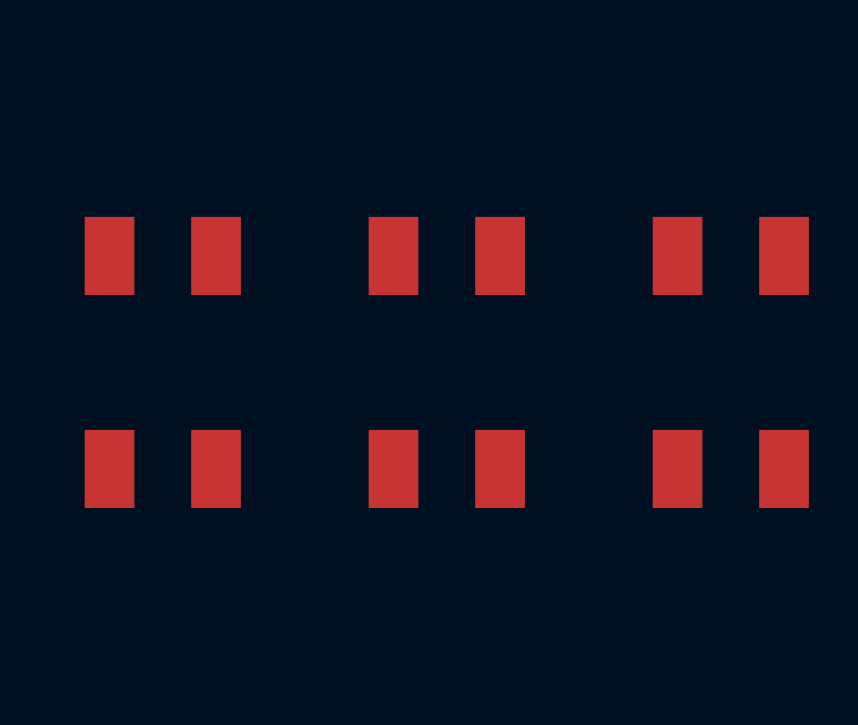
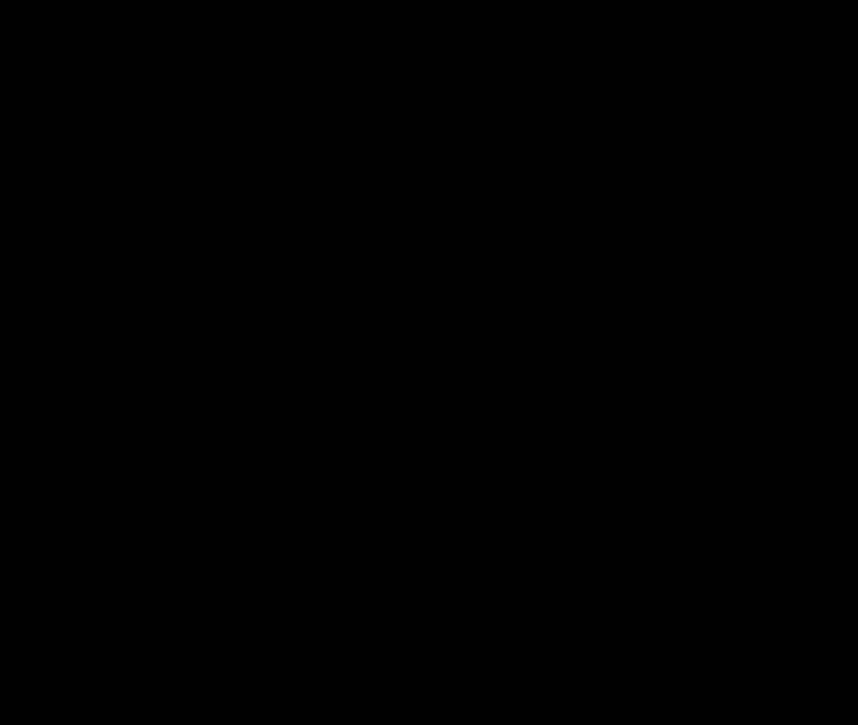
part: (162, 255) -> none
part: (446, 255) -> none
part: (730, 255) -> none
part: (162, 468) -> none
part: (446, 468) -> none
part: (730, 468) -> none

